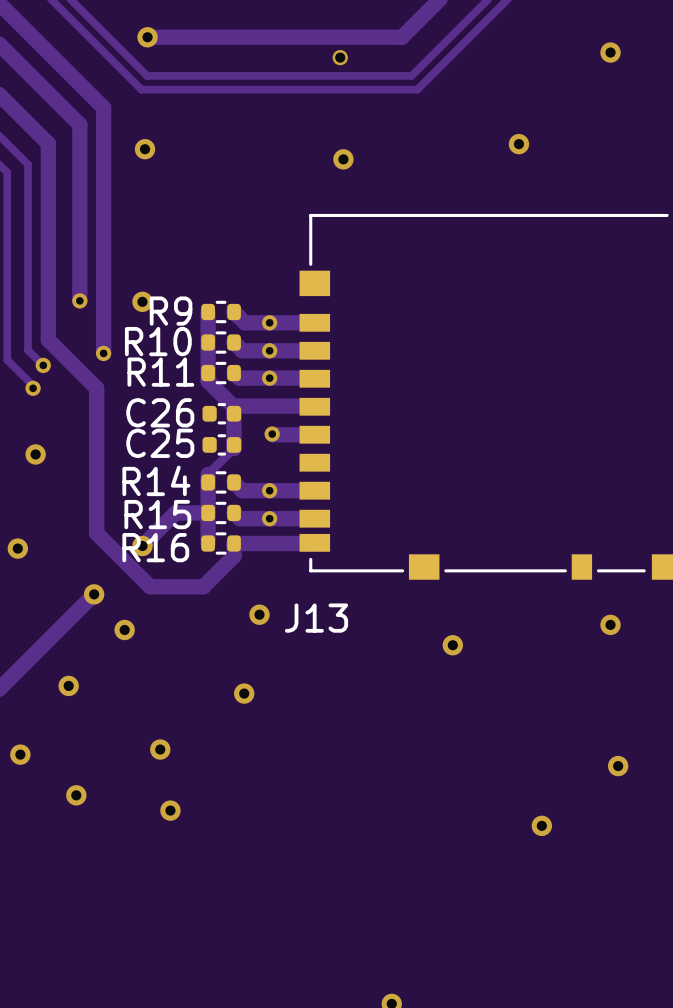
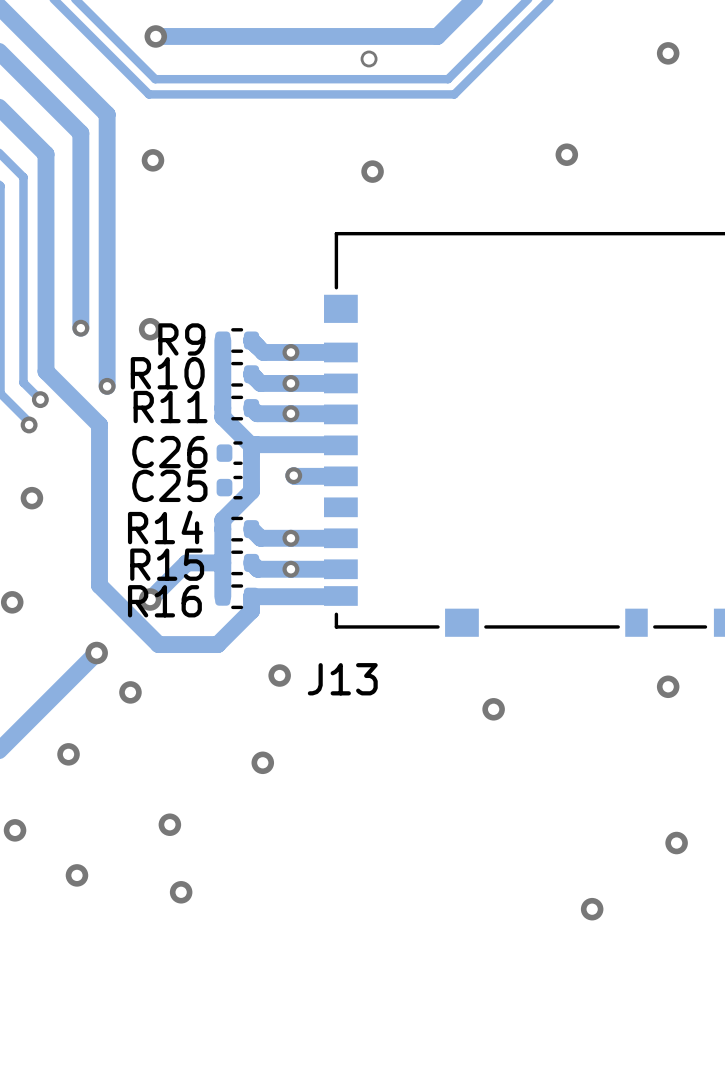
track width: thin (234, 448) (208, 474) -> thick (251, 491) (222, 520)

